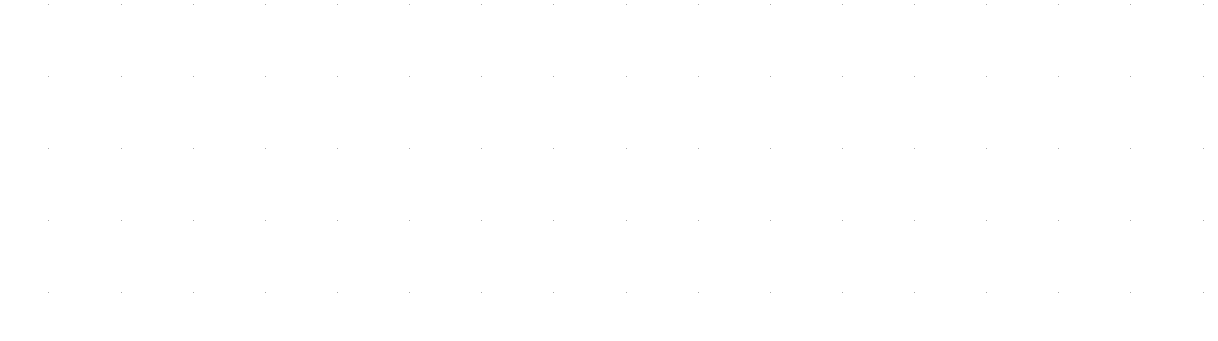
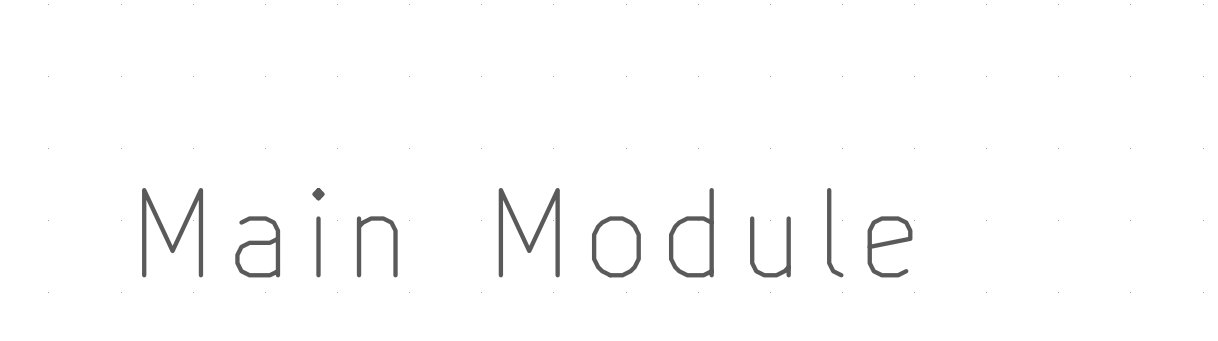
text: none -> Main Module (527, 232)

